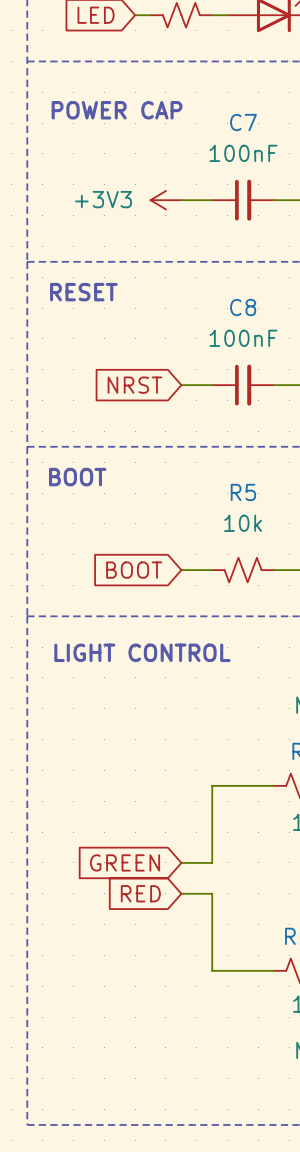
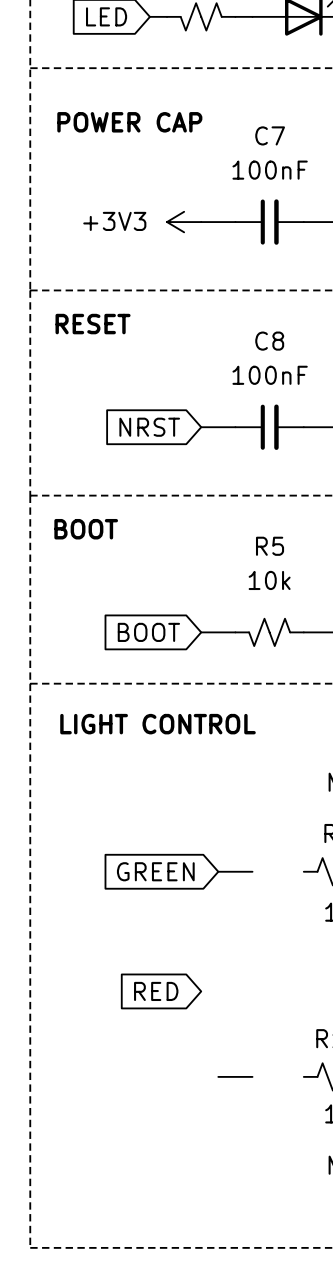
wire: (212, 785) (212, 862) (181, 862) -> (235, 871) (218, 871)
wire: (227, 785) (273, 785) -> none
global label position: GREEN (125, 862) -> GREEN (155, 871)
wire: (181, 893) (212, 893) (212, 970) -> (218, 1076) (235, 1076)
wire: (227, 970) (273, 970) -> none

